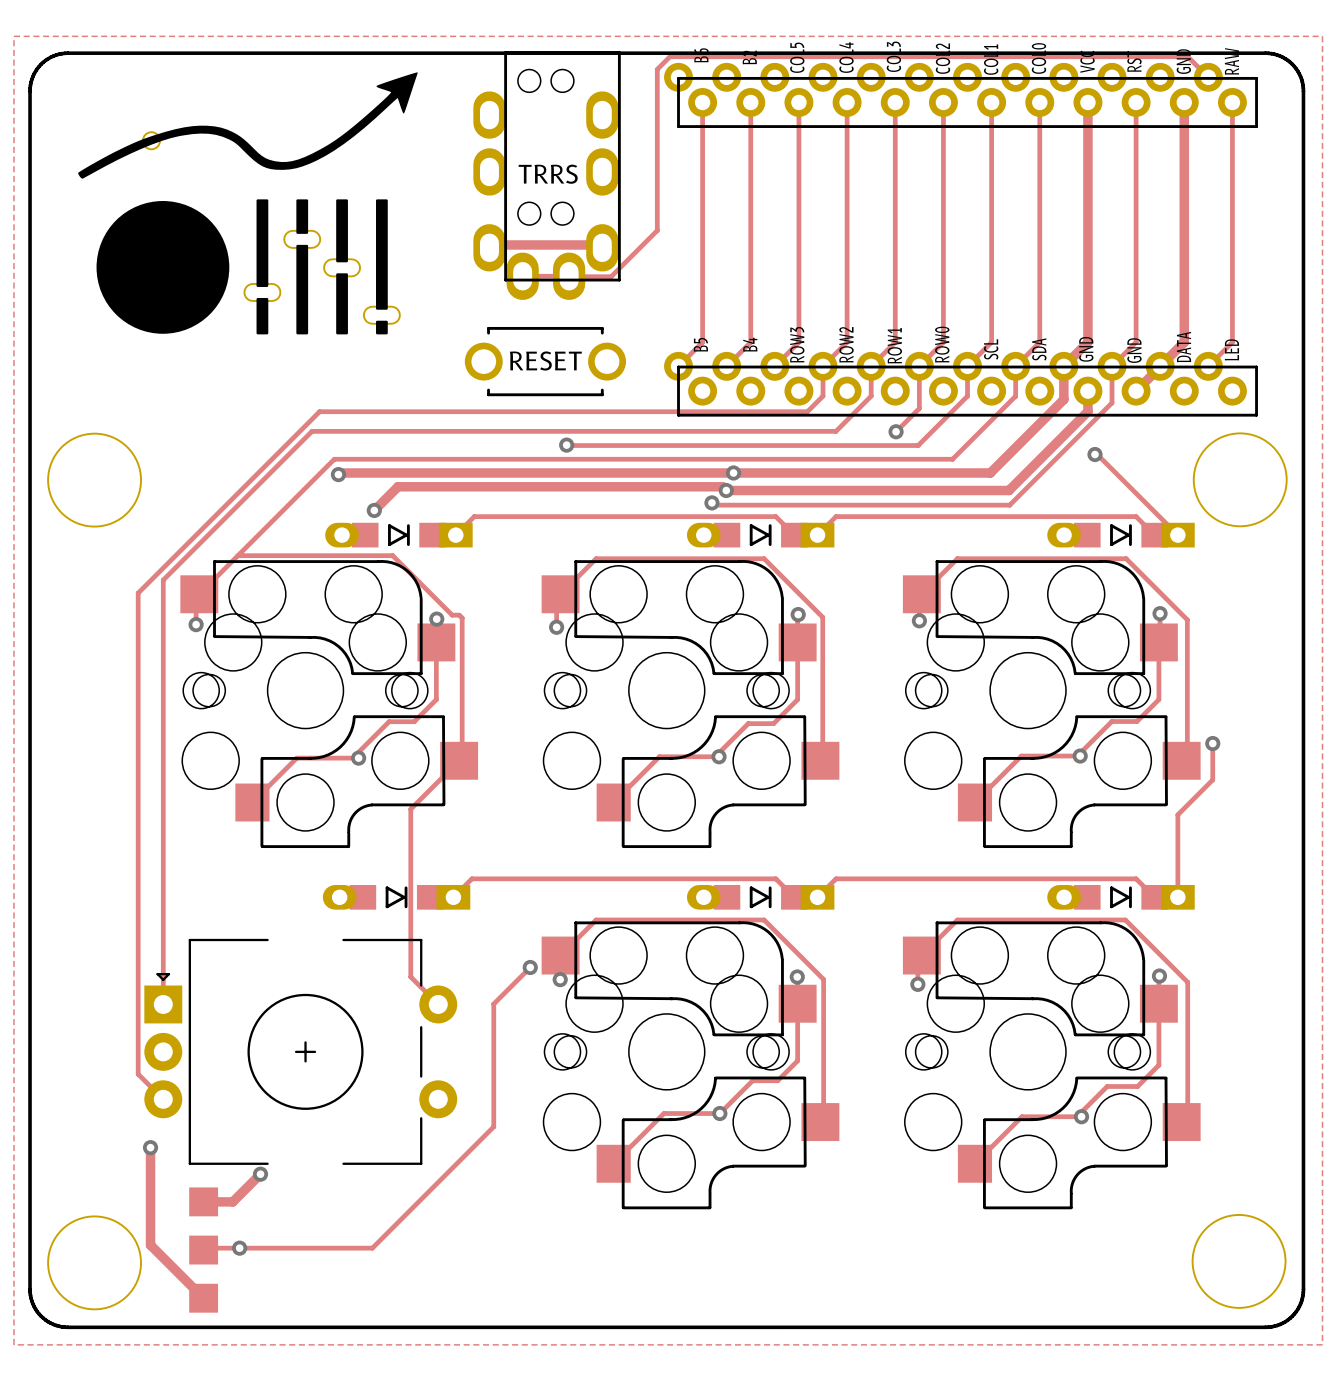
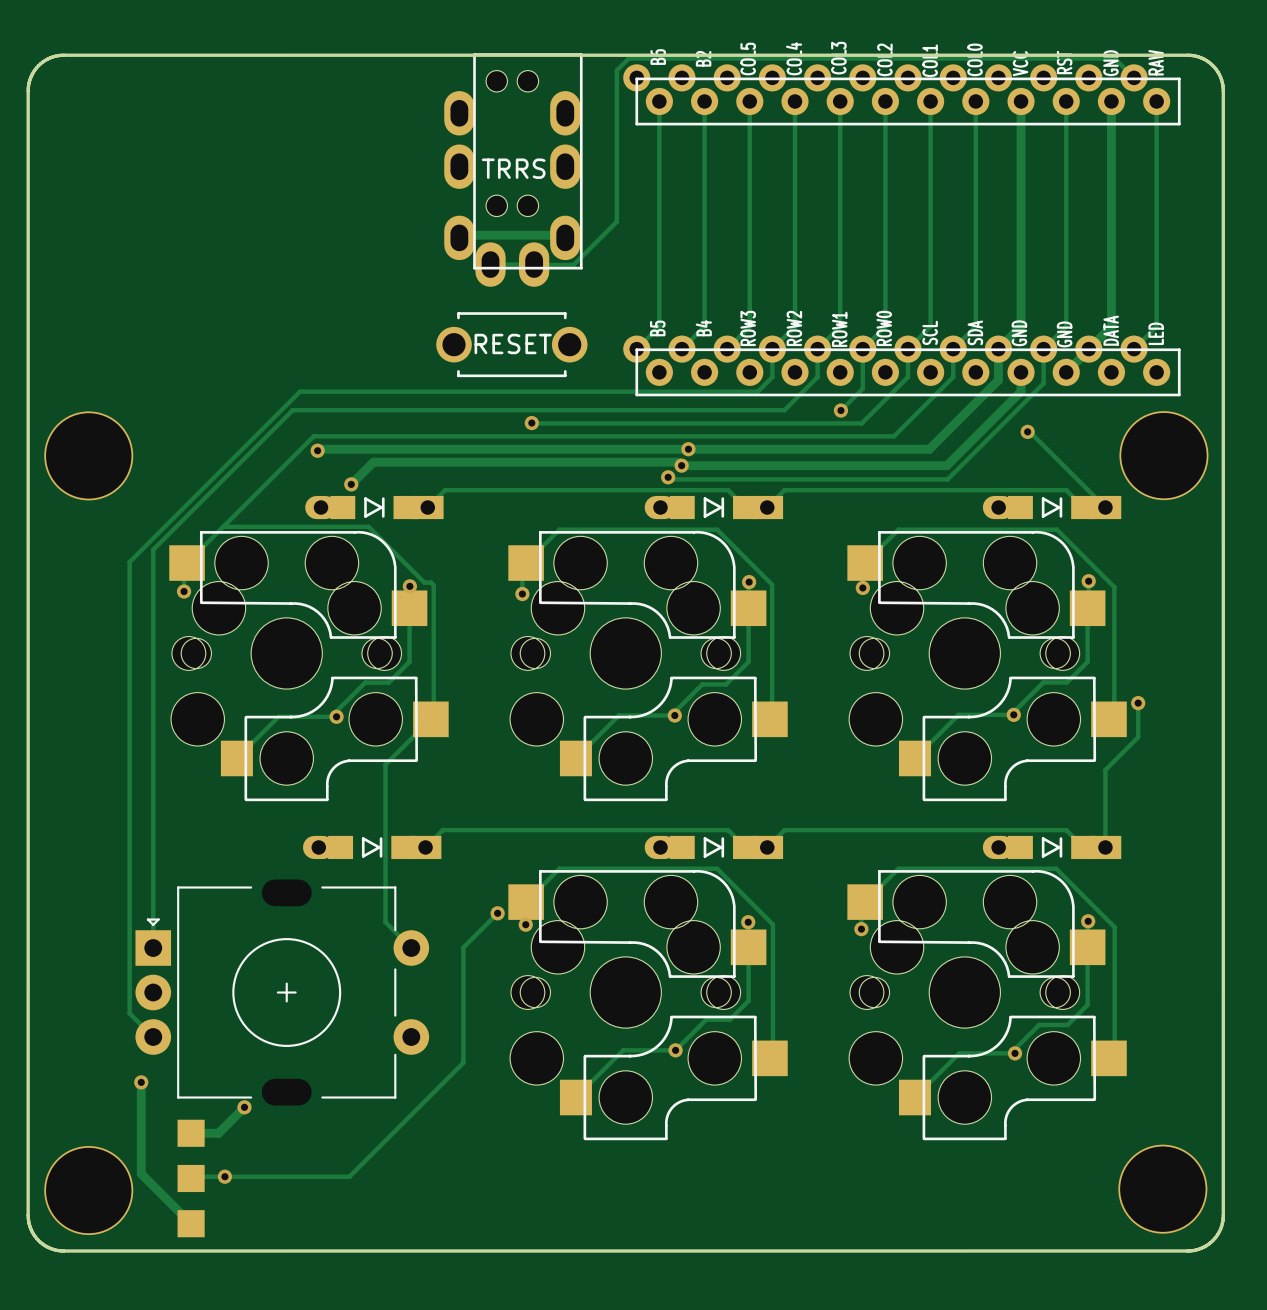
zone outline: (13, 36) (13, 1344) (1322, 1344) (1322, 36) (13, 36) -> none
part: (247, 203) -> none

